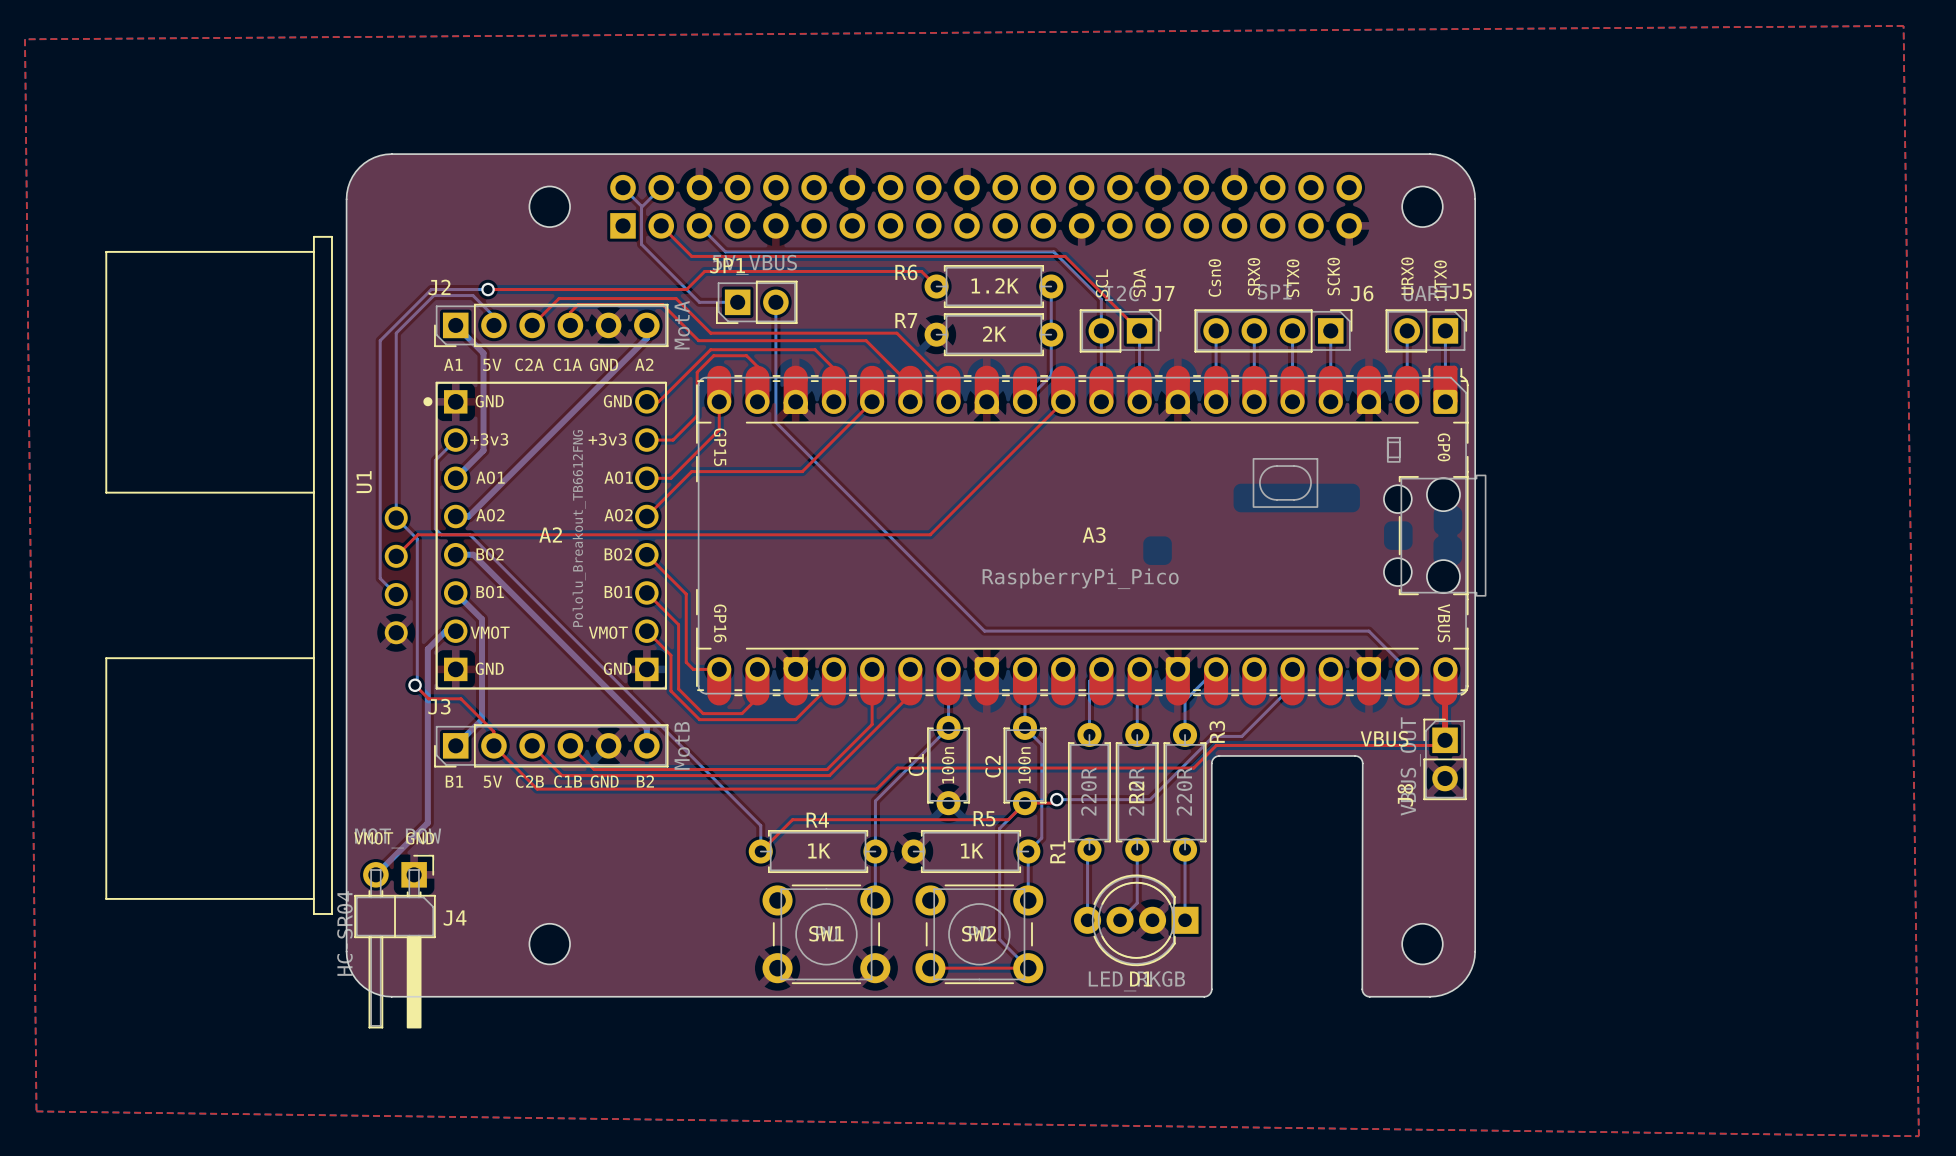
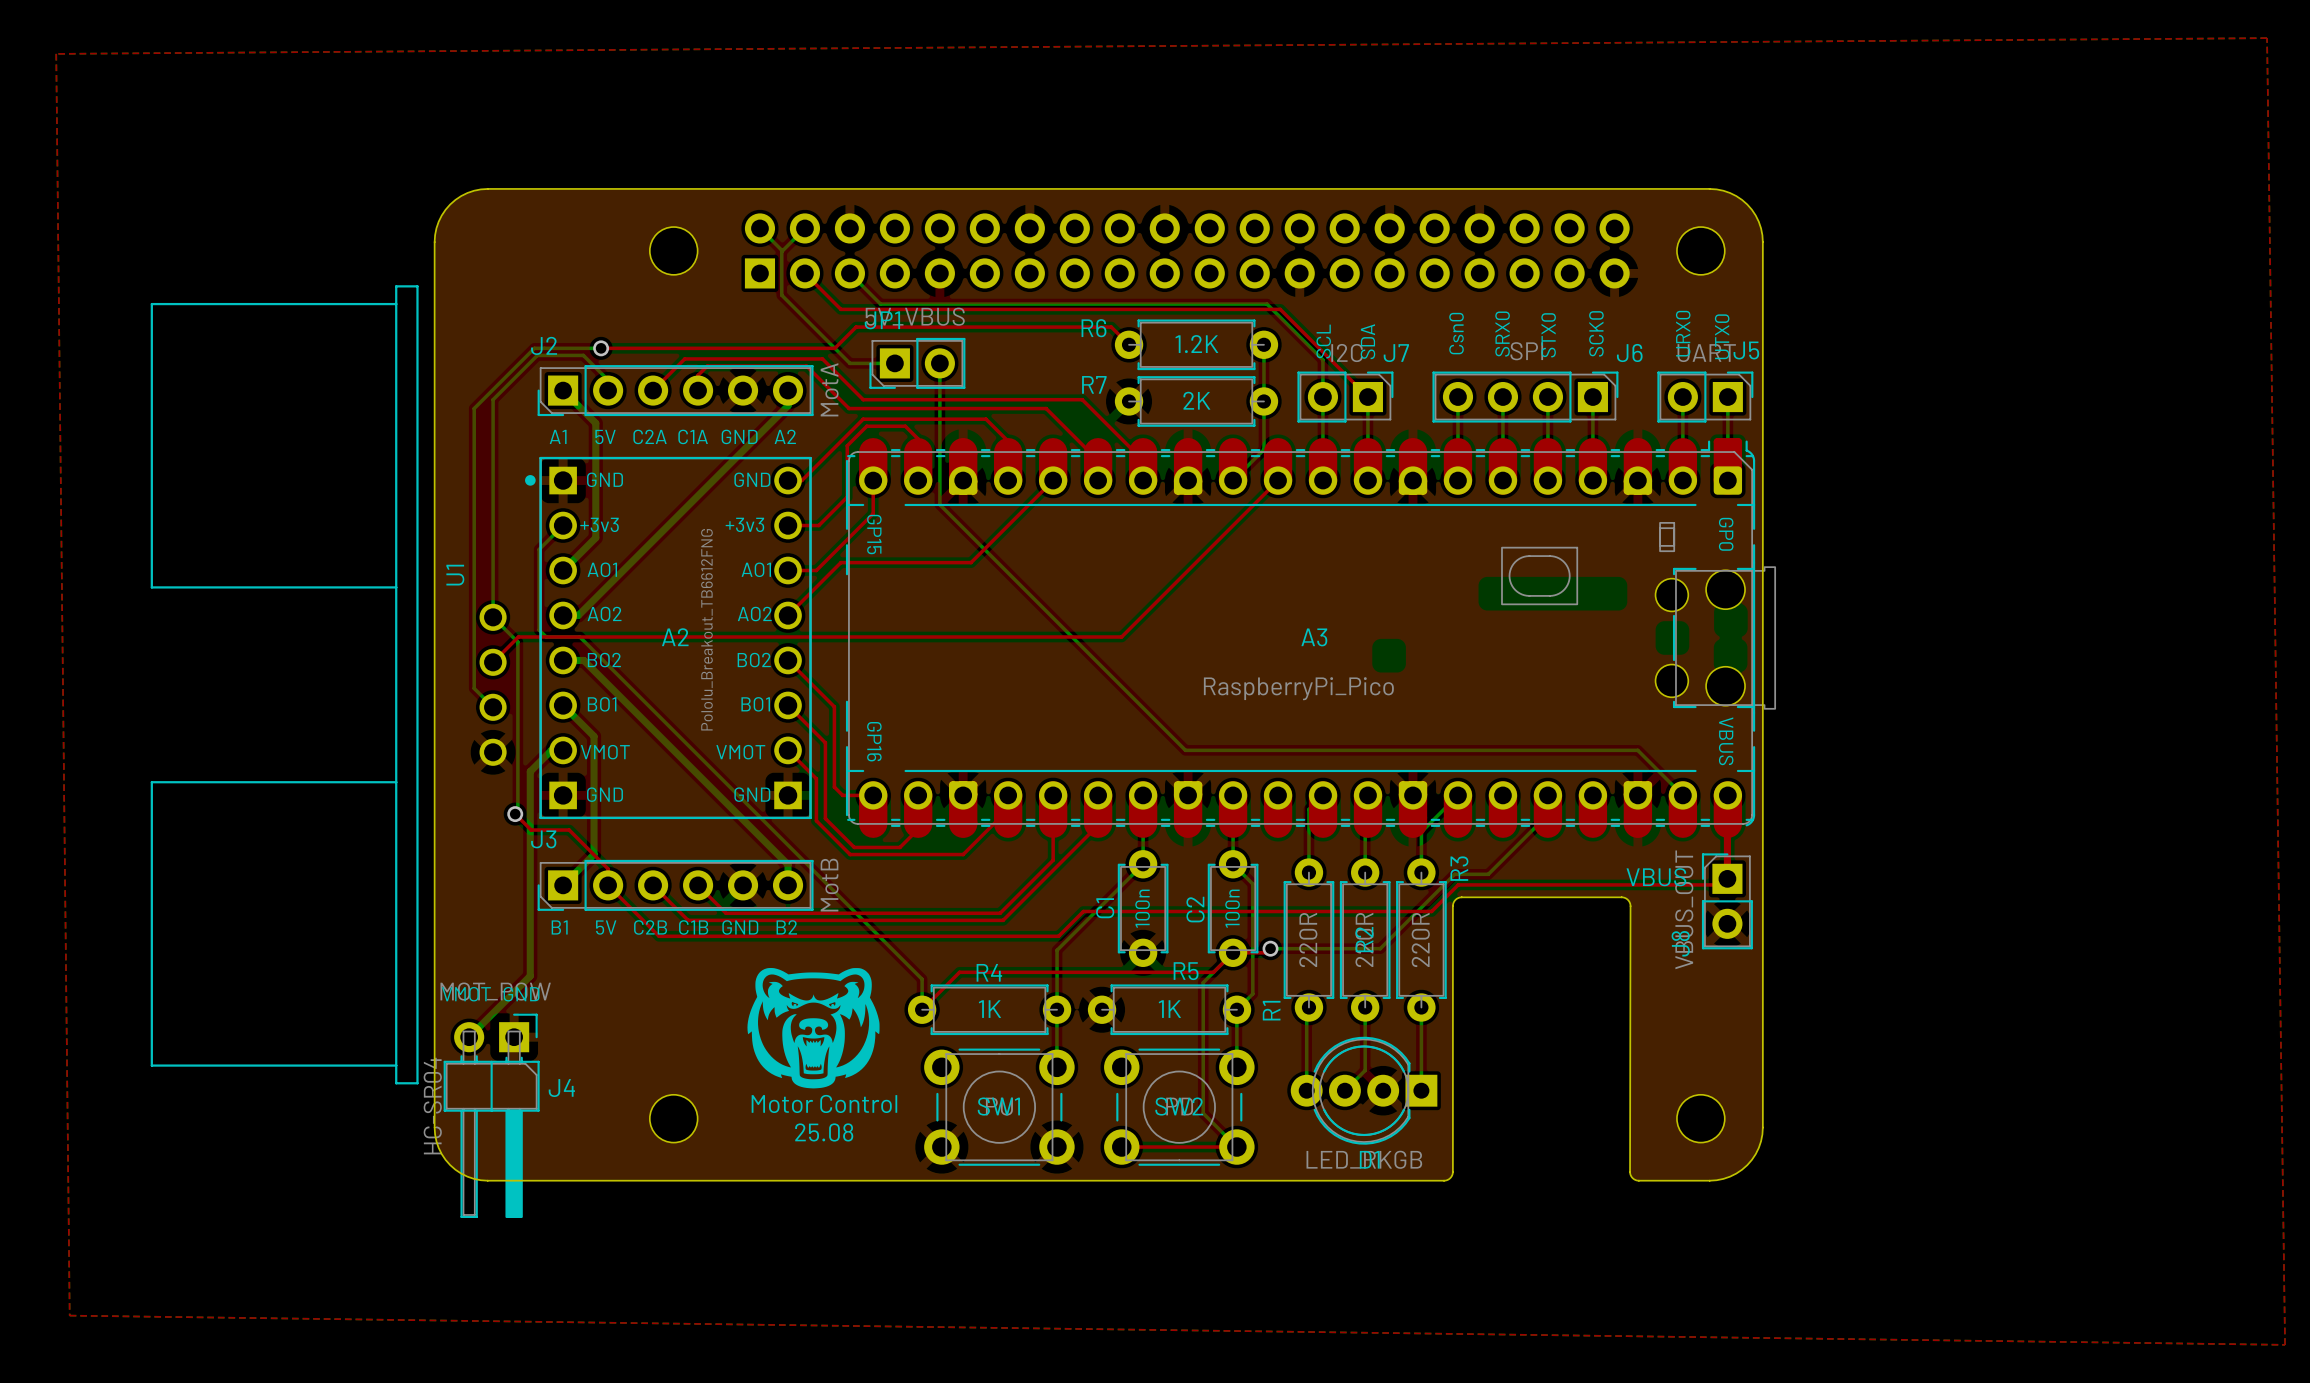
drawing: none -> [747, 967, 880, 1089]
text: none -> Motor Control (824, 1103)
text: none -> 25.08 (824, 1132)

